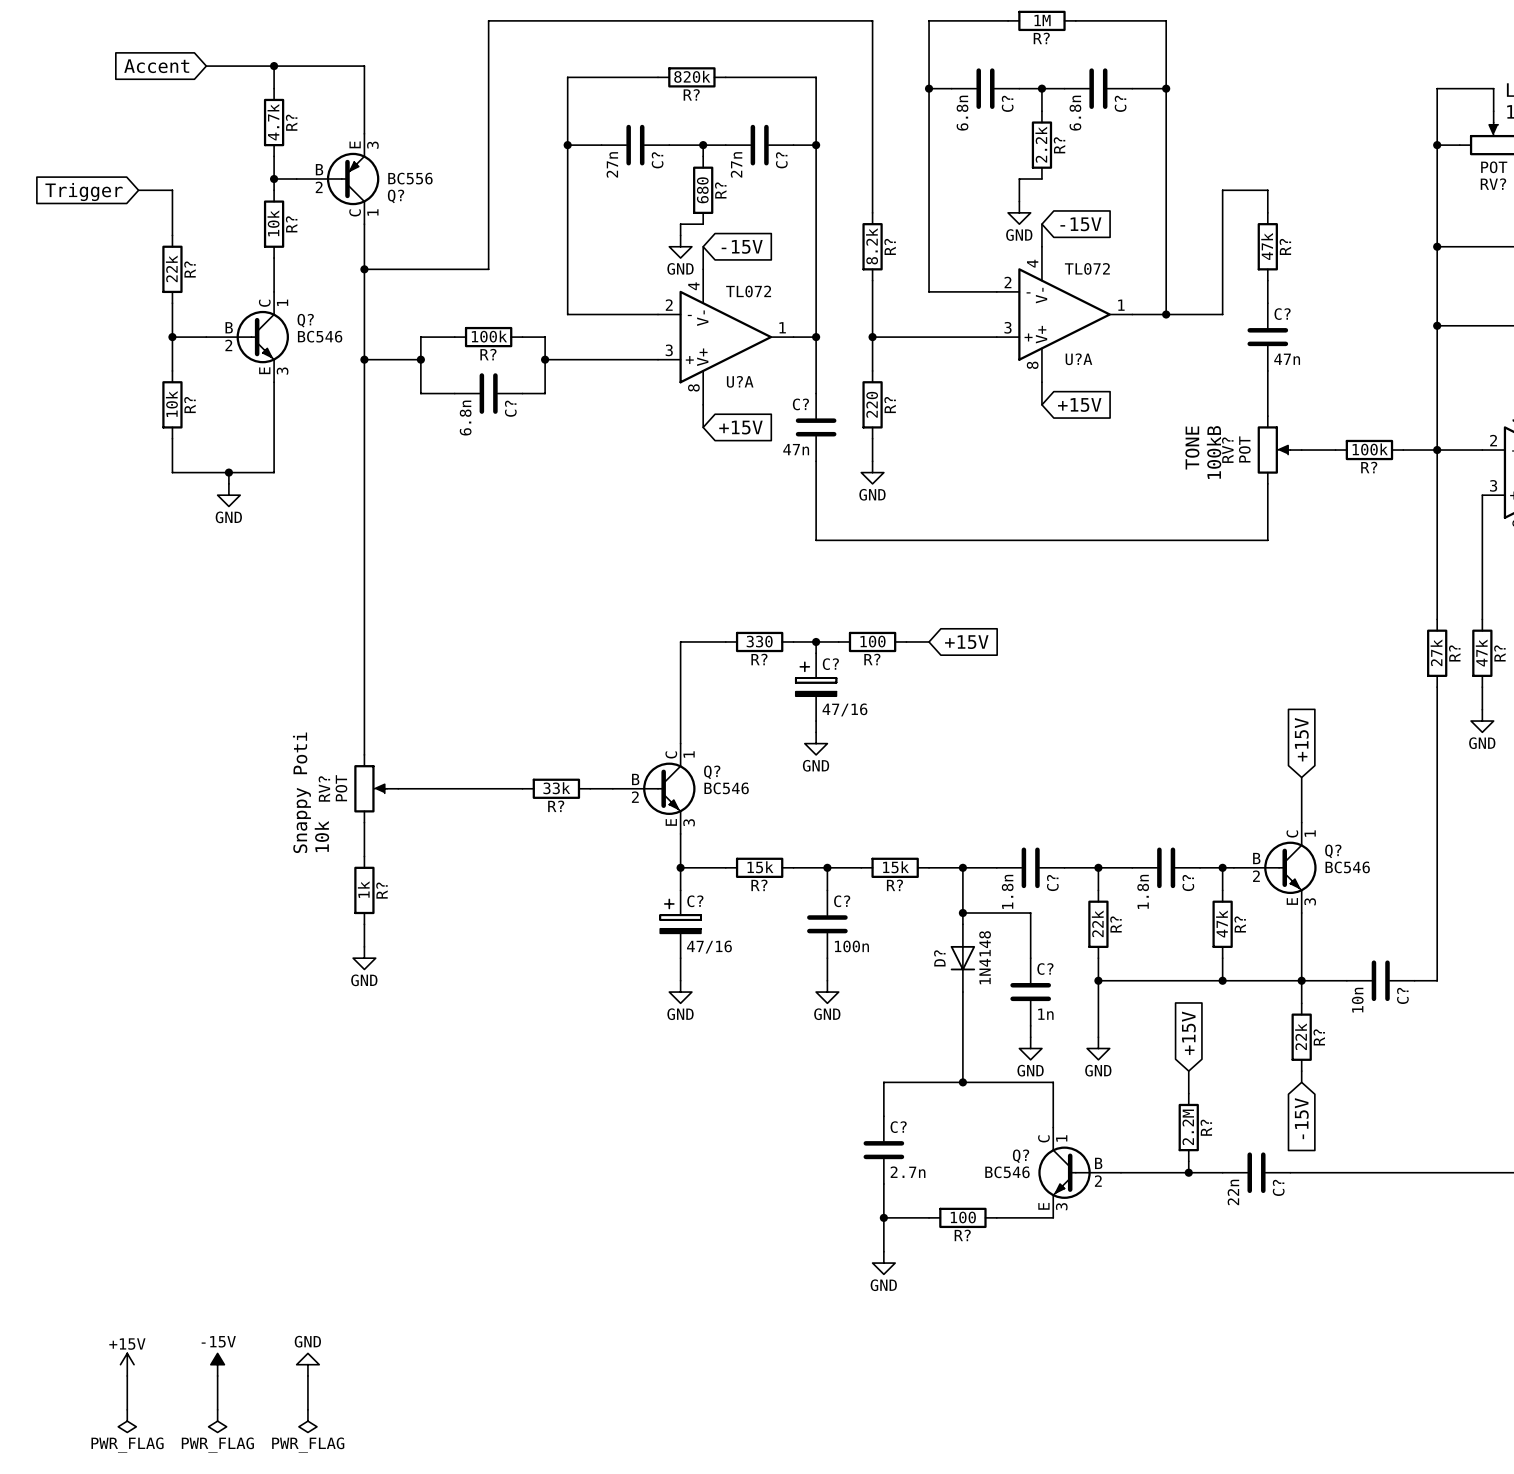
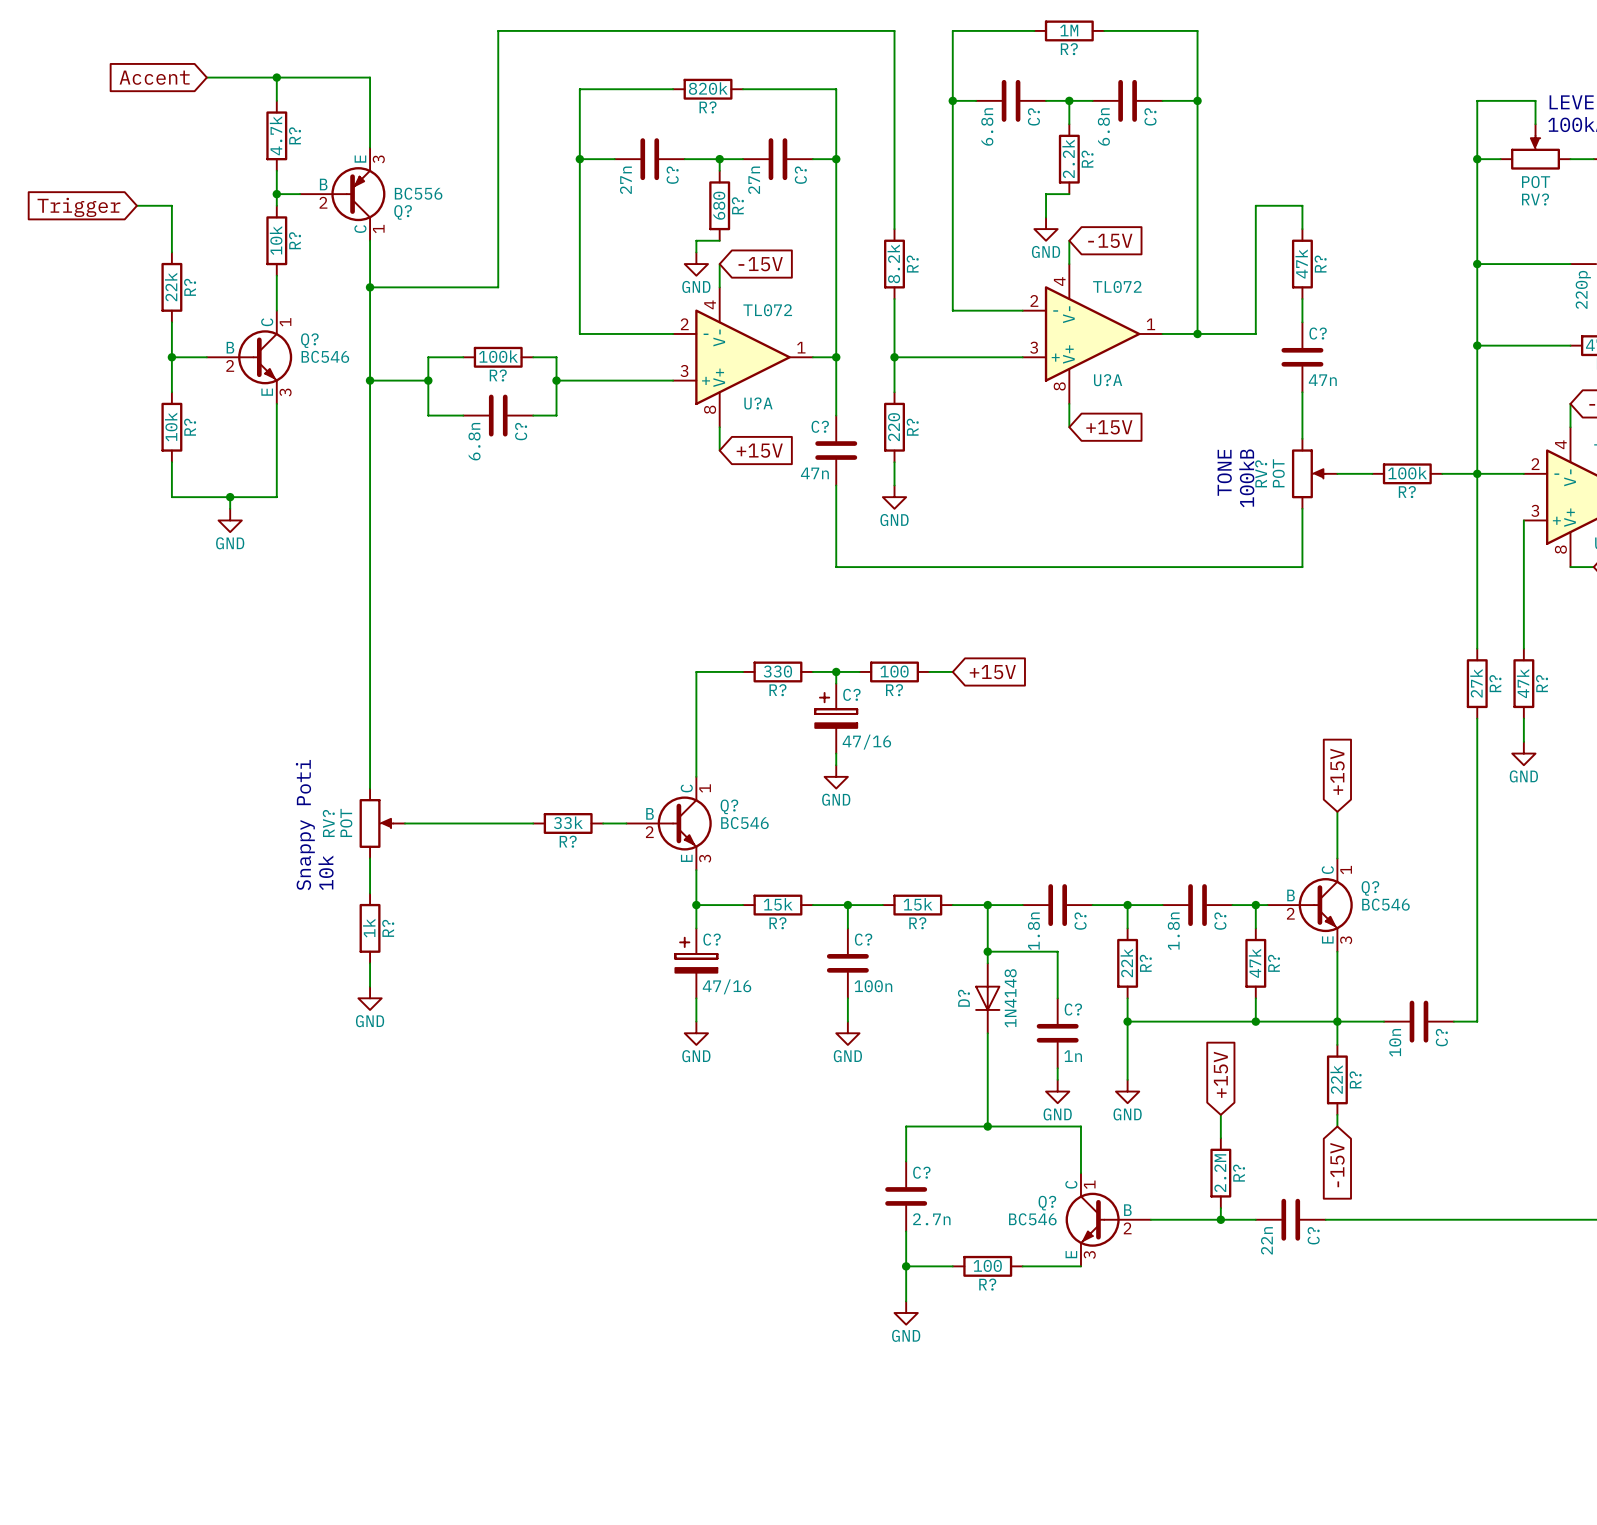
power symbol: +15V (127, 1364) -> none
power symbol: -15V (217, 1364) -> none
power symbol: GND (307, 1364) -> none
wire: (127, 1375) (127, 1409) -> none
wire: (217, 1375) (217, 1409) -> none
wire: (307, 1375) (307, 1409) -> none
power symbol: PWR_FLAG (127, 1421) -> none
power symbol: PWR_FLAG (217, 1421) -> none
power symbol: PWR_FLAG (307, 1421) -> none

